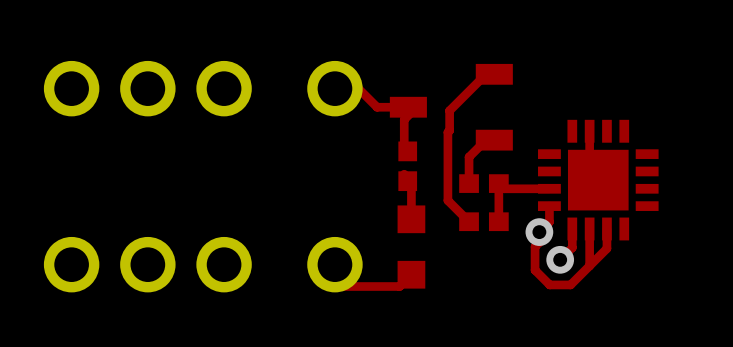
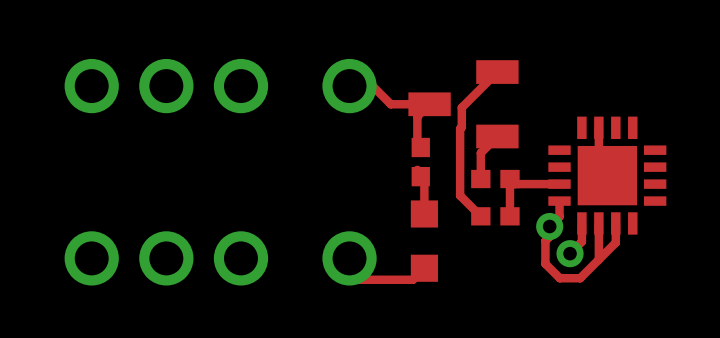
part footprint: [389, 63, 513, 151] -> [408, 60, 519, 149]

